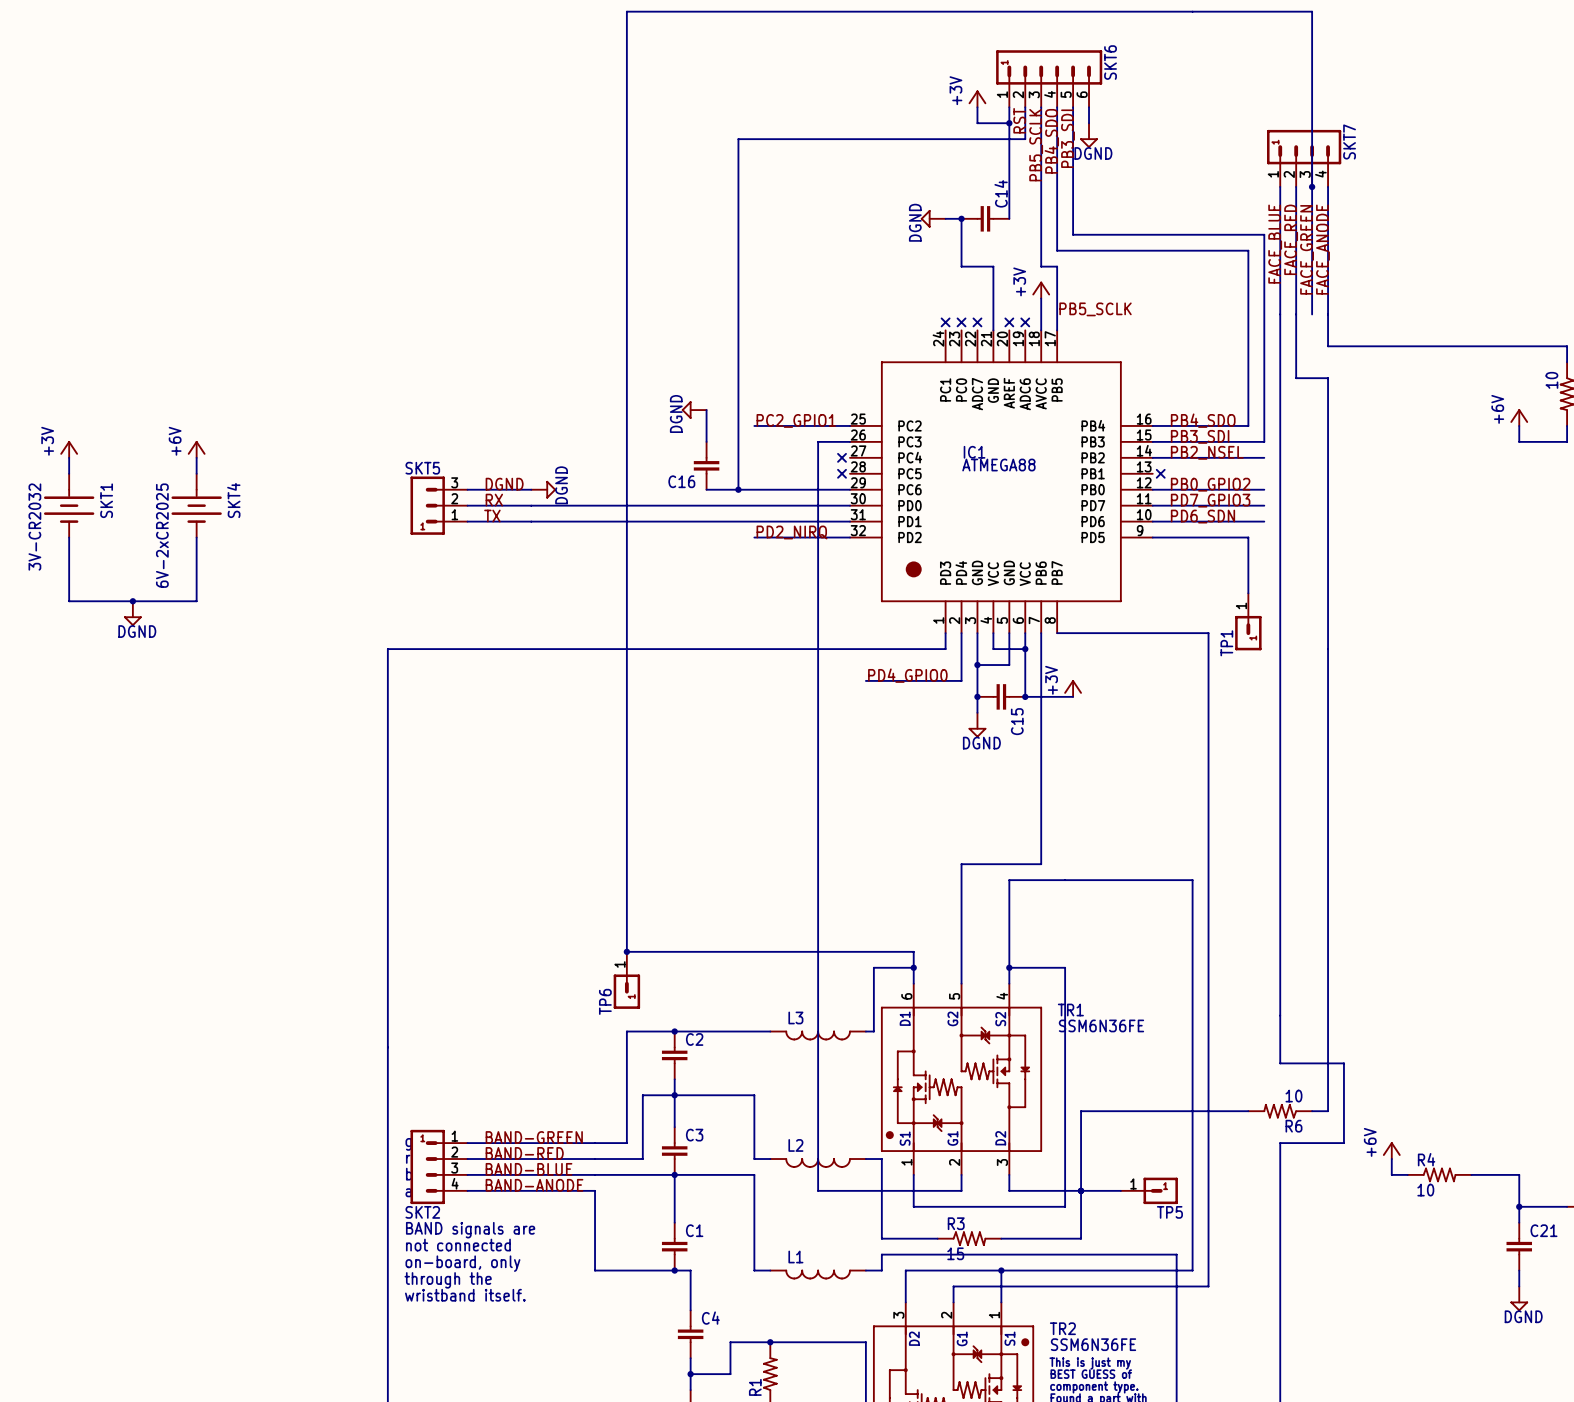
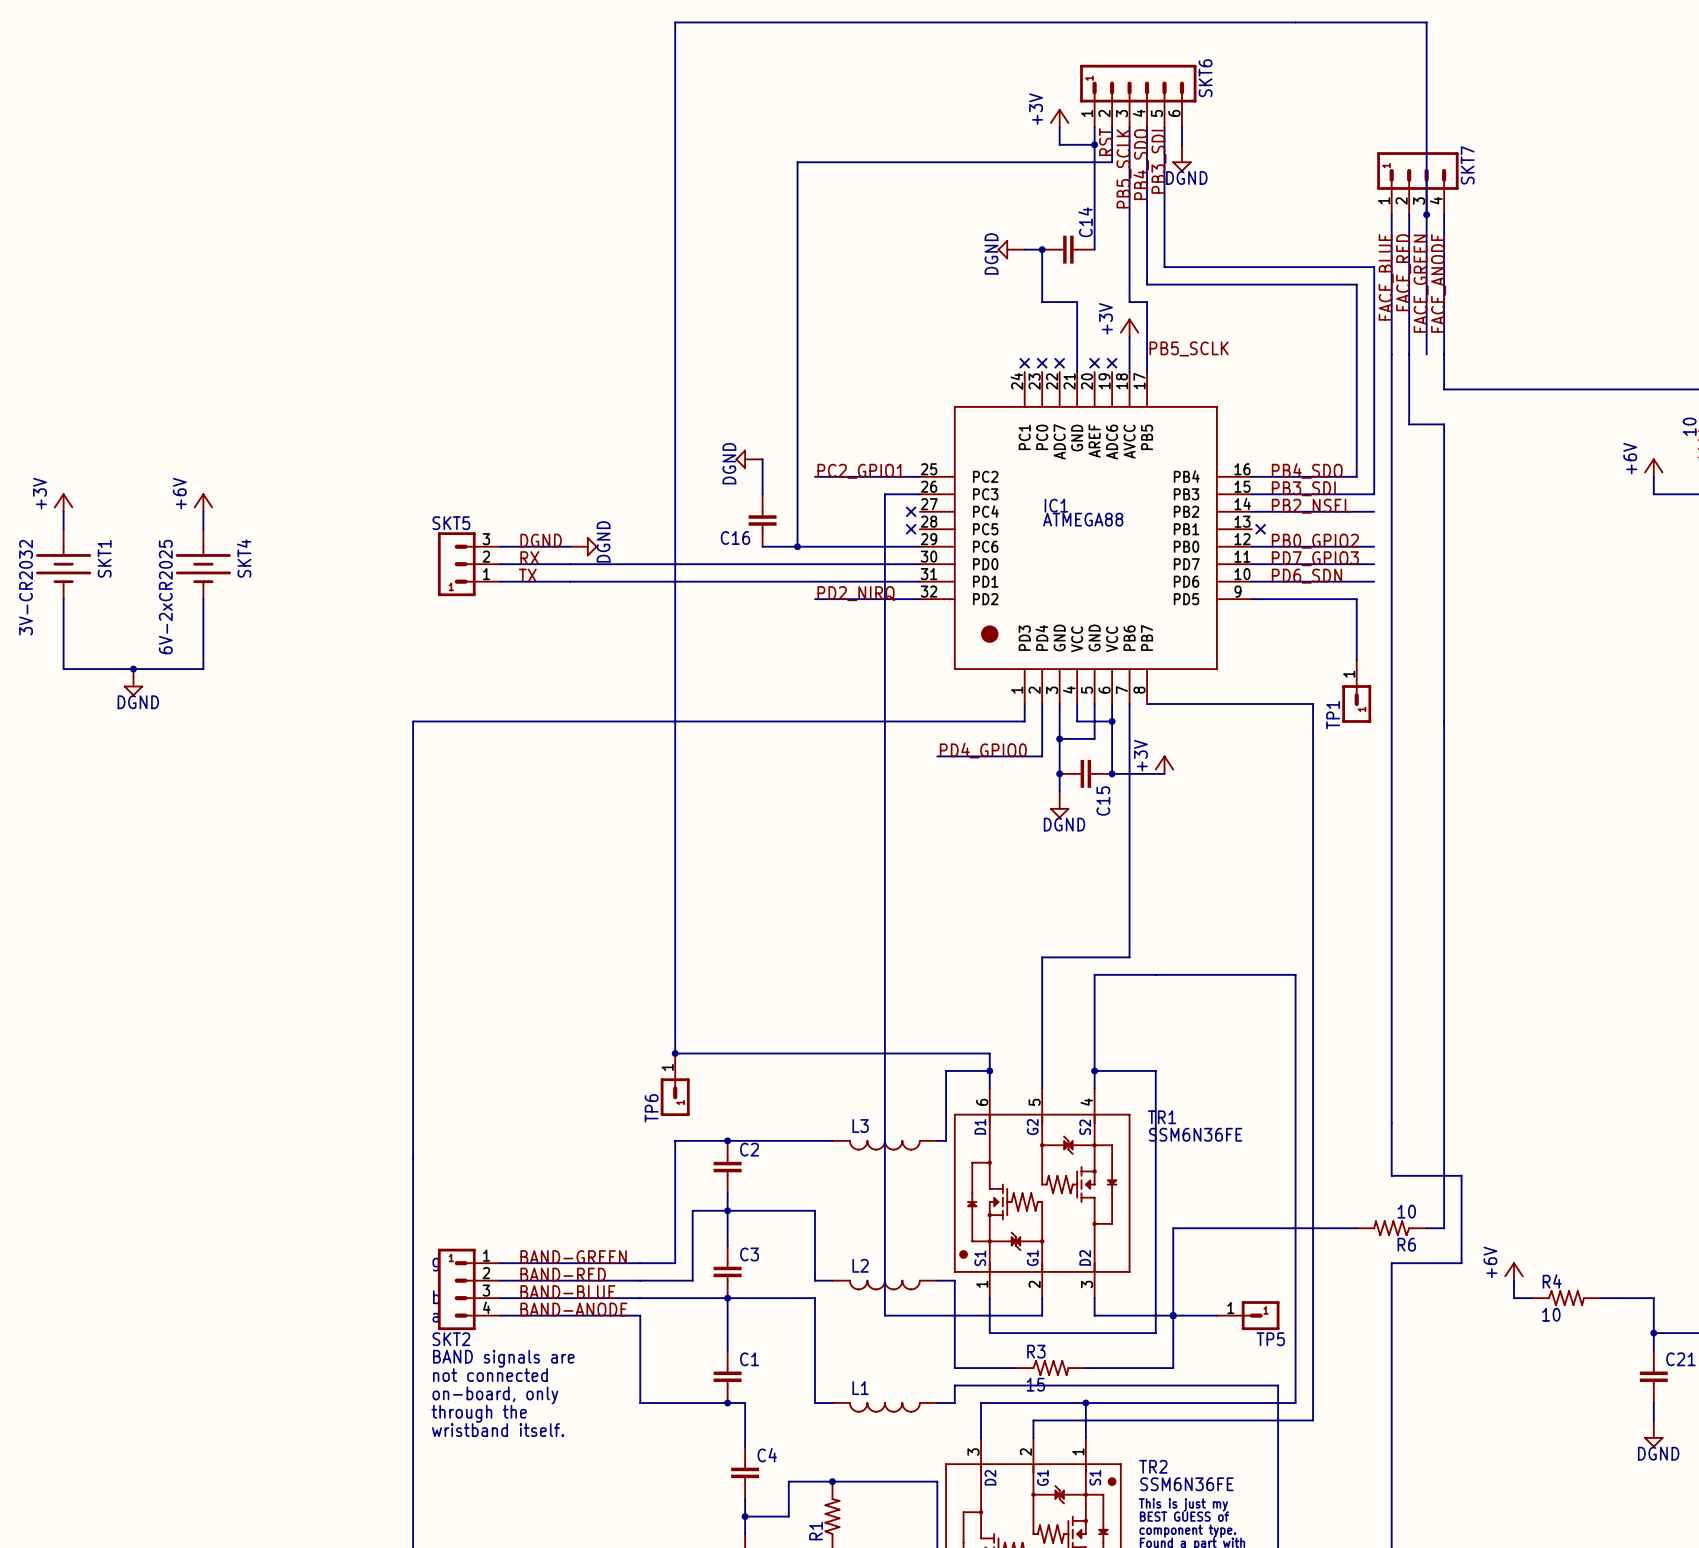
text: r (408, 1159) -> none

